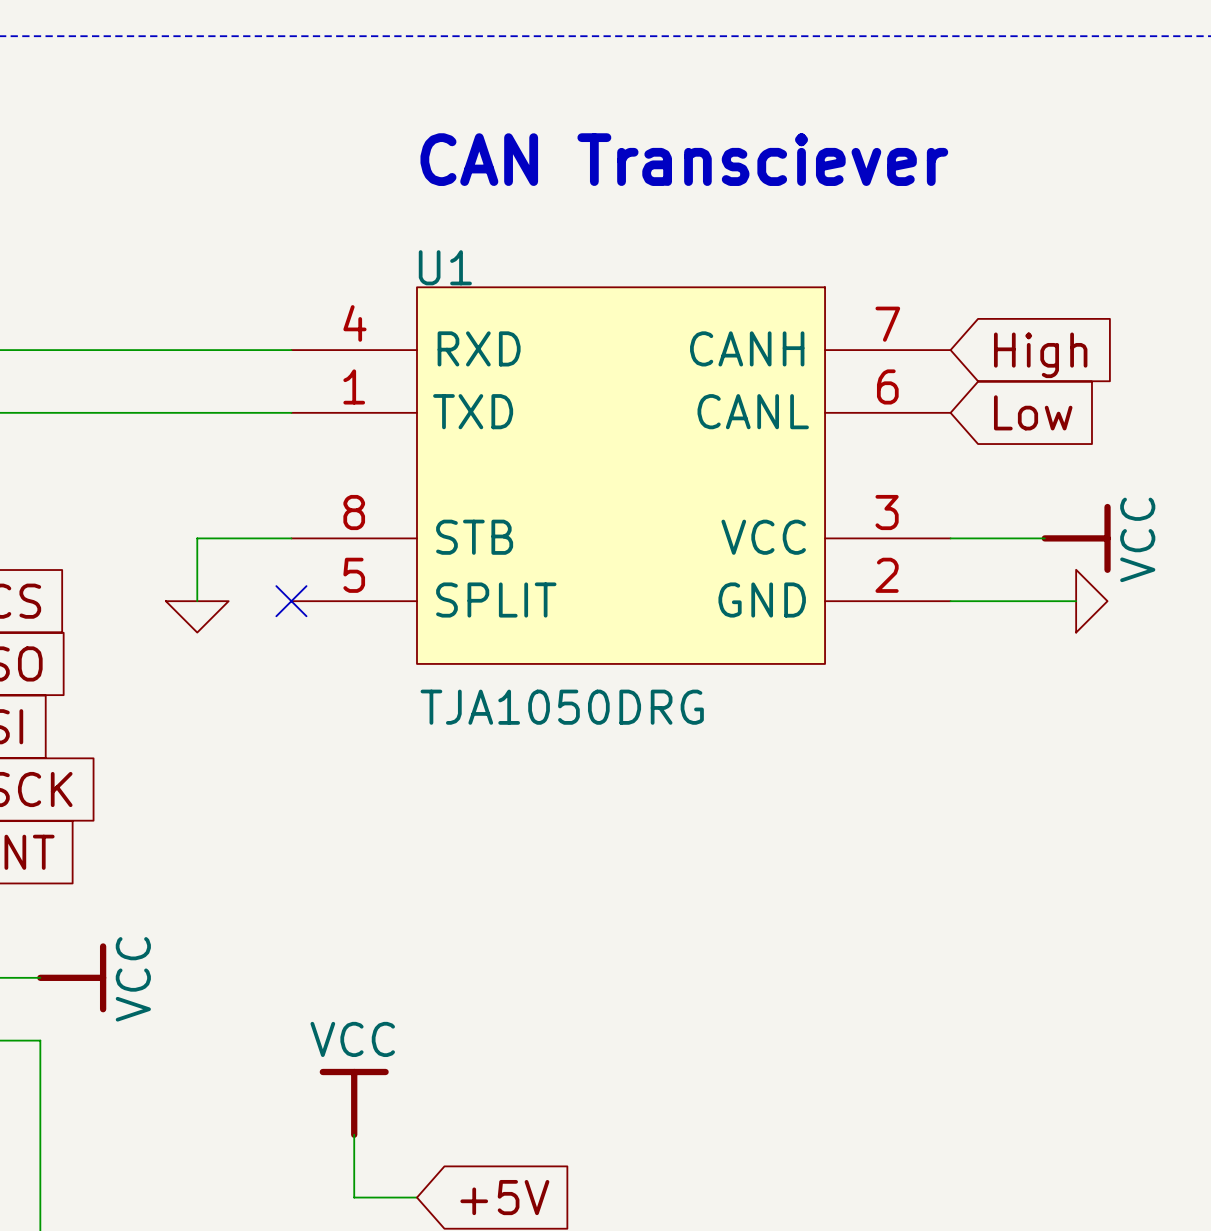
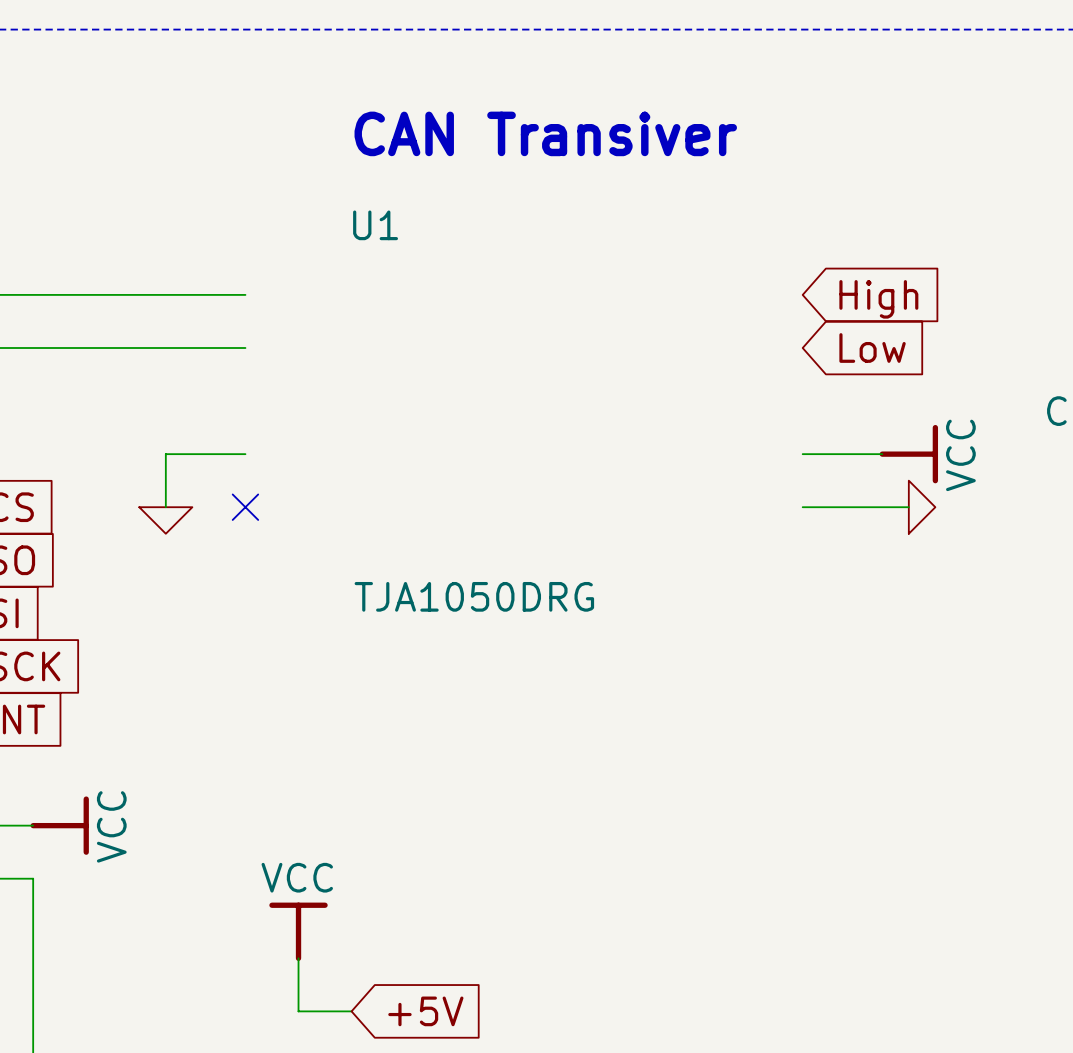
text: CAN Transciever (684, 159) -> CAN Transiver (545, 133)
U1 symbol: [291, 286, 951, 665] -> [353, 210, 595, 612]

